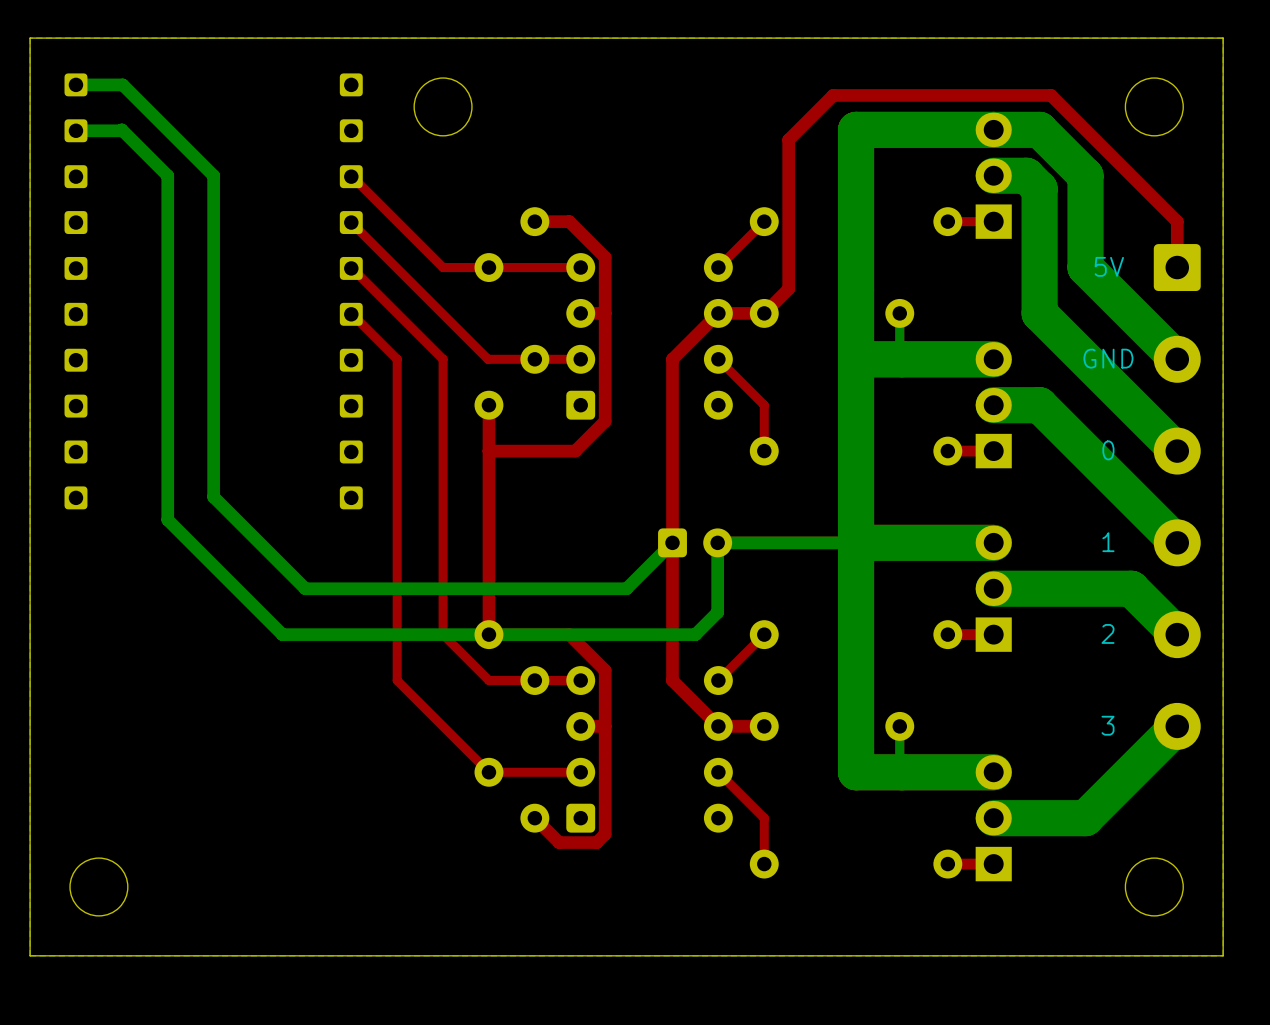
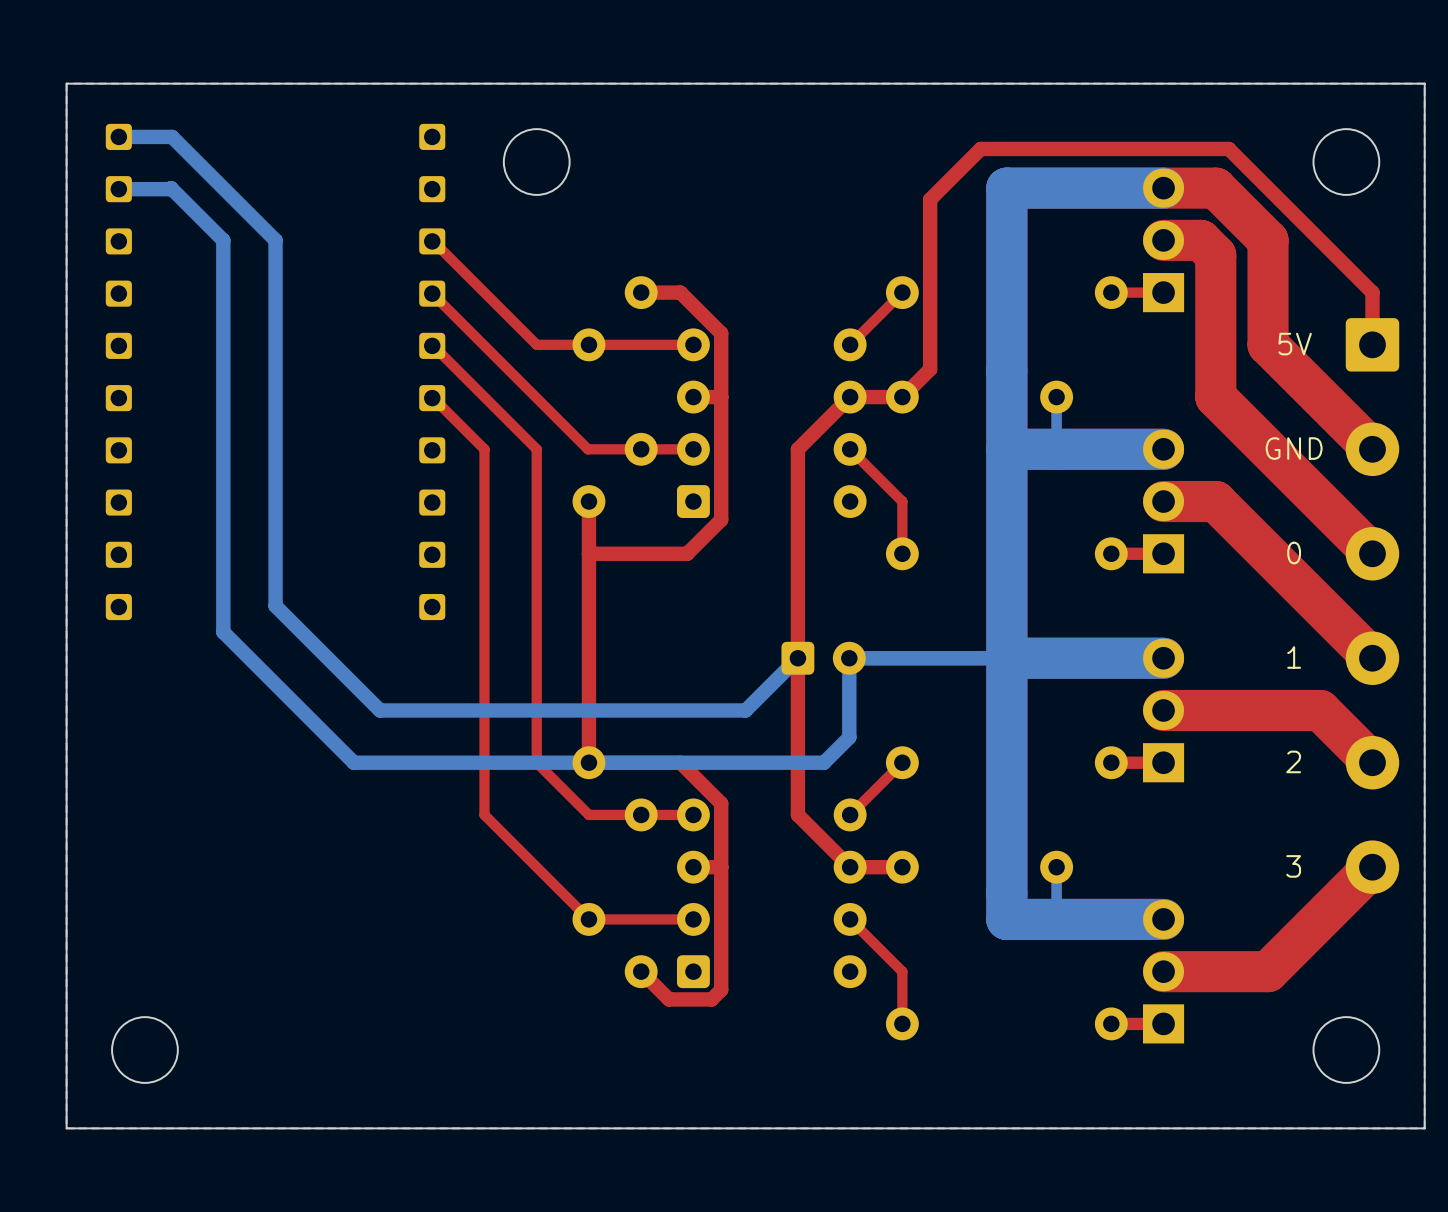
top track: none -> (1163, 188) (1215, 188) (1268, 240) (1268, 344) (1372, 449)
bottom track: (993, 129) (1039, 129) (1085, 175) (1085, 267) (1177, 359) -> none
top track: none -> (1163, 240) (1200, 240) (1215, 255) (1215, 397) (1372, 553)
bottom track: (993, 175) (1026, 175) (1039, 188) (1039, 313) (1177, 451) -> none
top track: none -> (1163, 501) (1215, 501) (1372, 658)
bottom track: (993, 405) (1039, 405) (1177, 542) -> none
top track: none -> (1163, 710) (1320, 710) (1372, 762)
bottom track: (993, 588) (1131, 588) (1177, 634) -> none
top track: none -> (1372, 867) (1268, 971) (1163, 971)
bottom track: (1177, 726) (1085, 818) (993, 818) -> none

